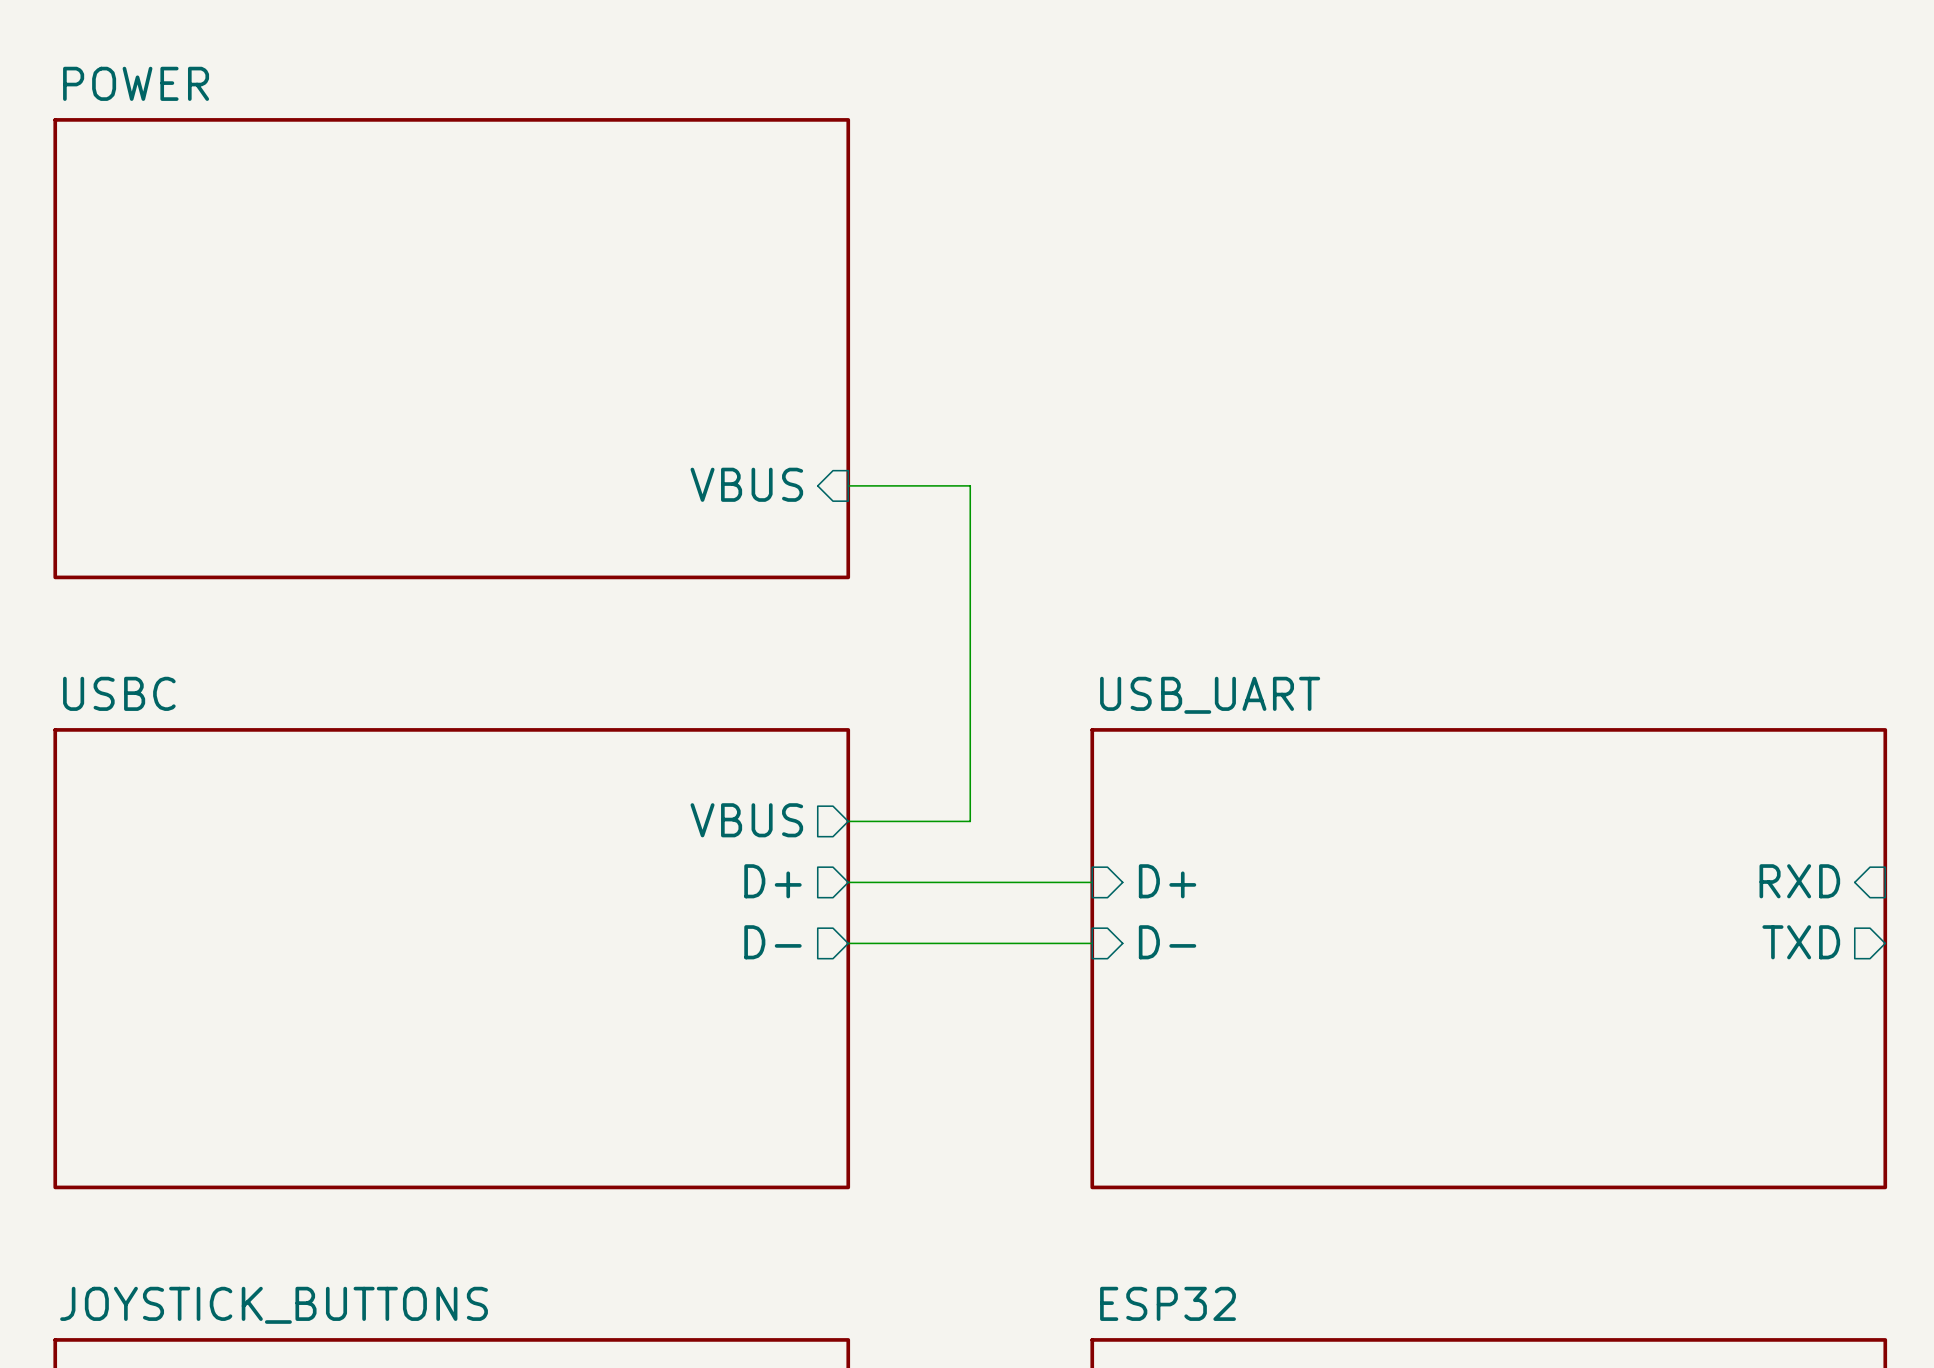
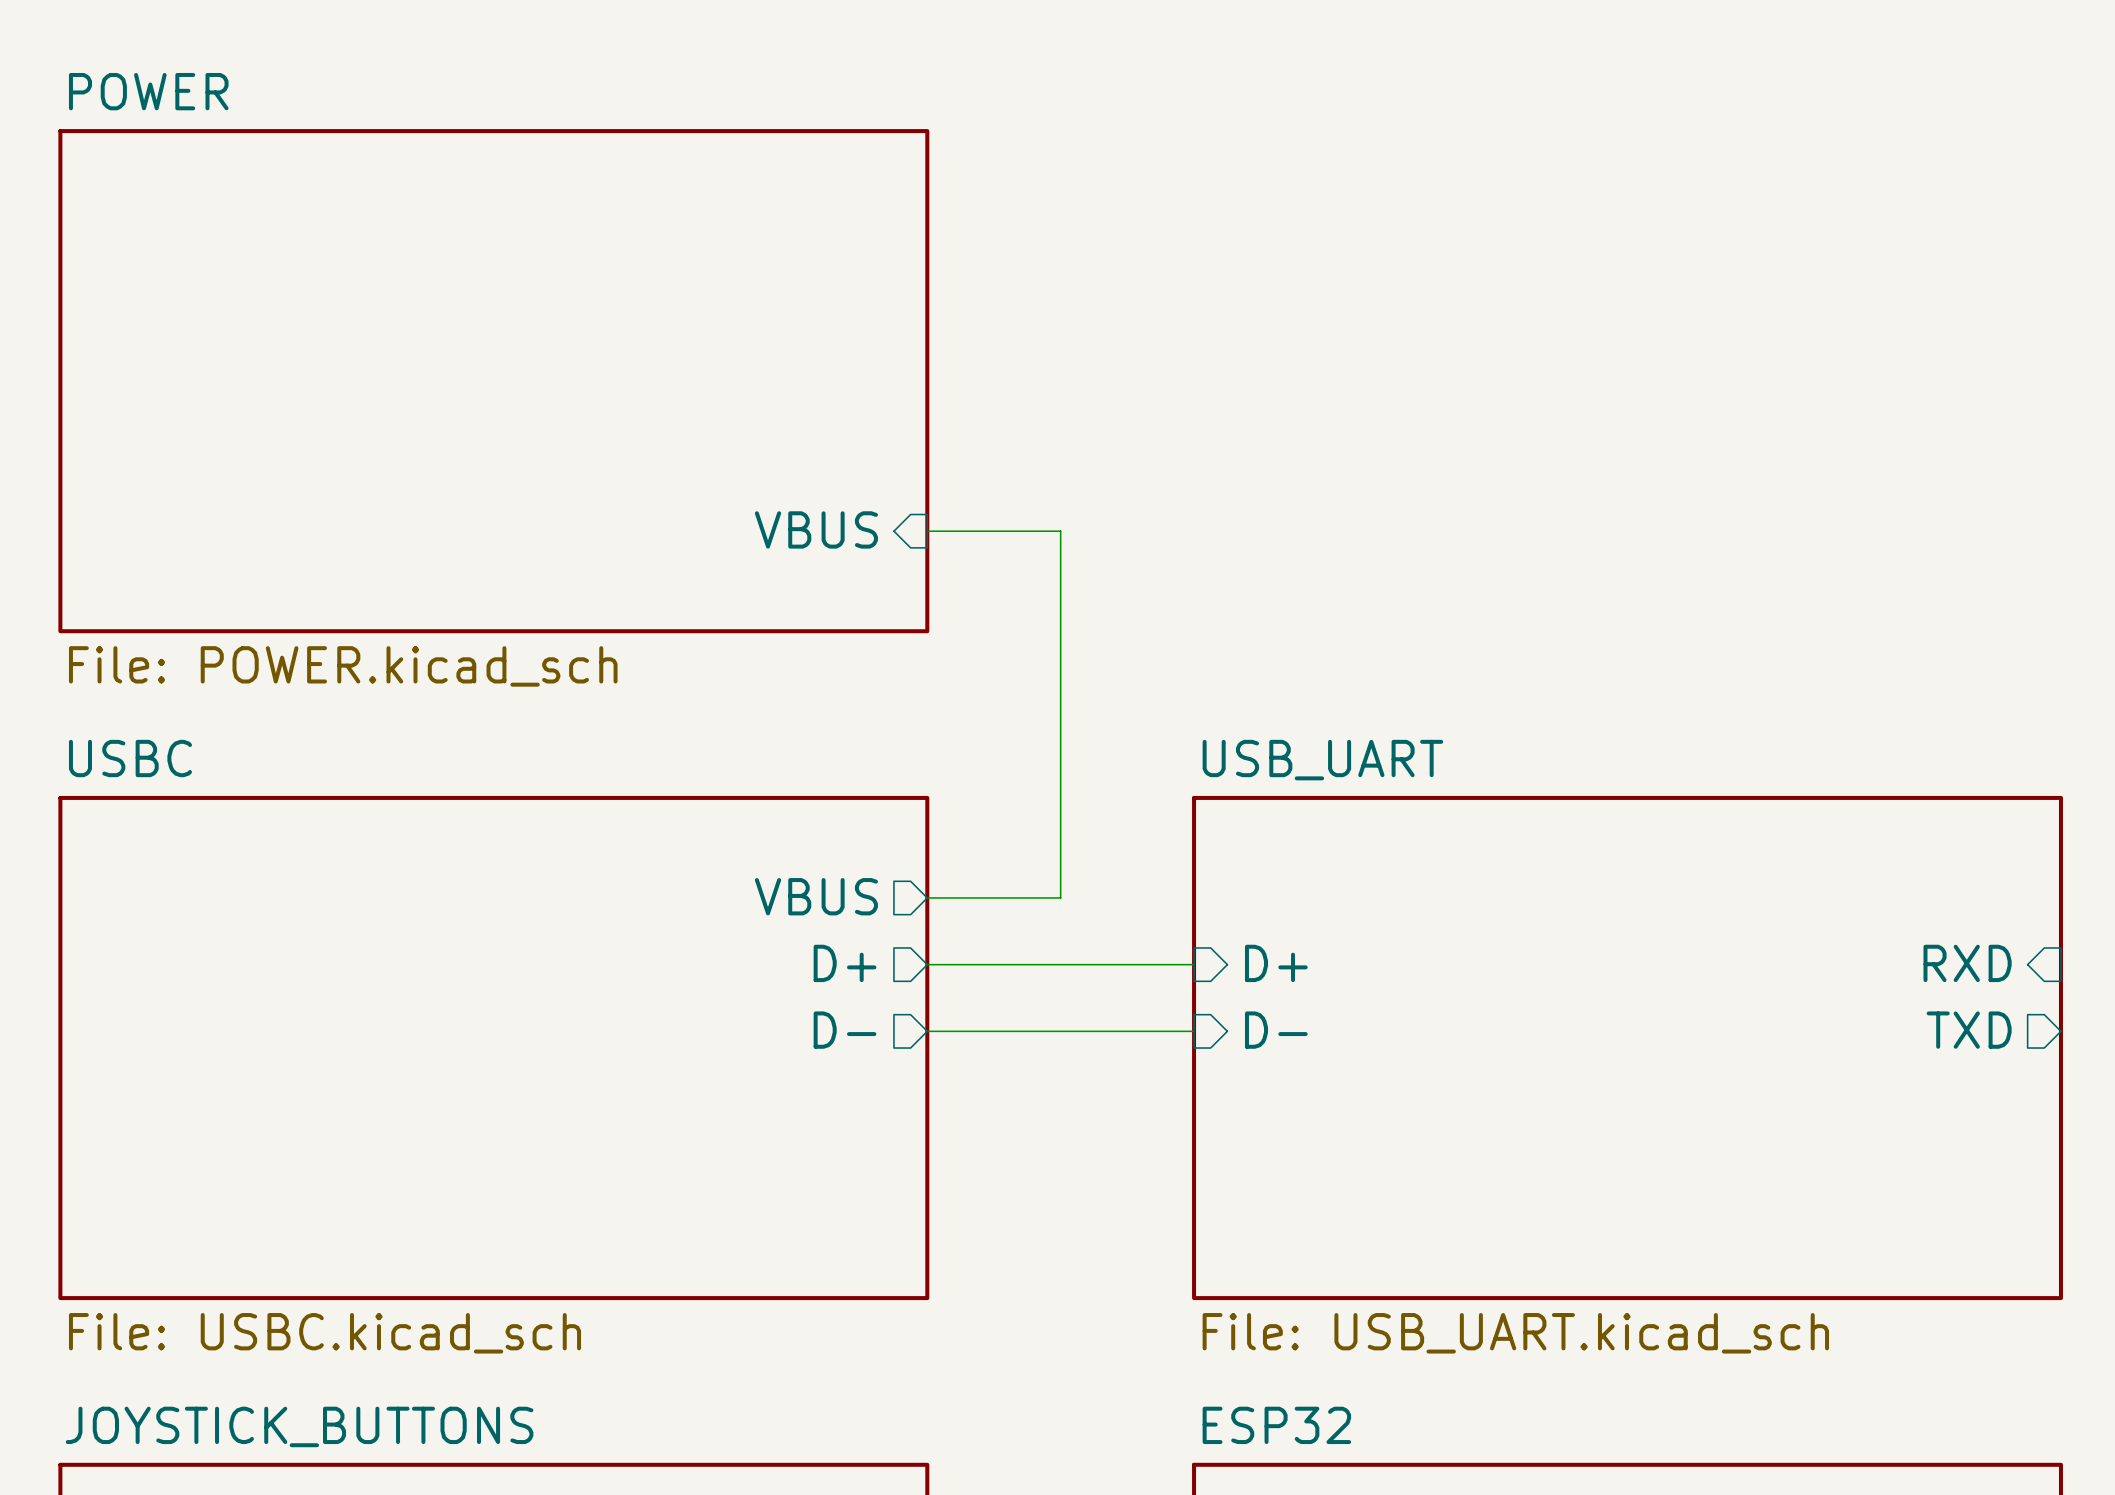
sheet POWER value: none -> File: POWER.kicad_sch (343, 666)
sheet USBC value: none -> File: USBC.kicad_sch (324, 1333)
sheet USB_UART value: none -> File: USB_UART.kicad_sch (1515, 1333)

